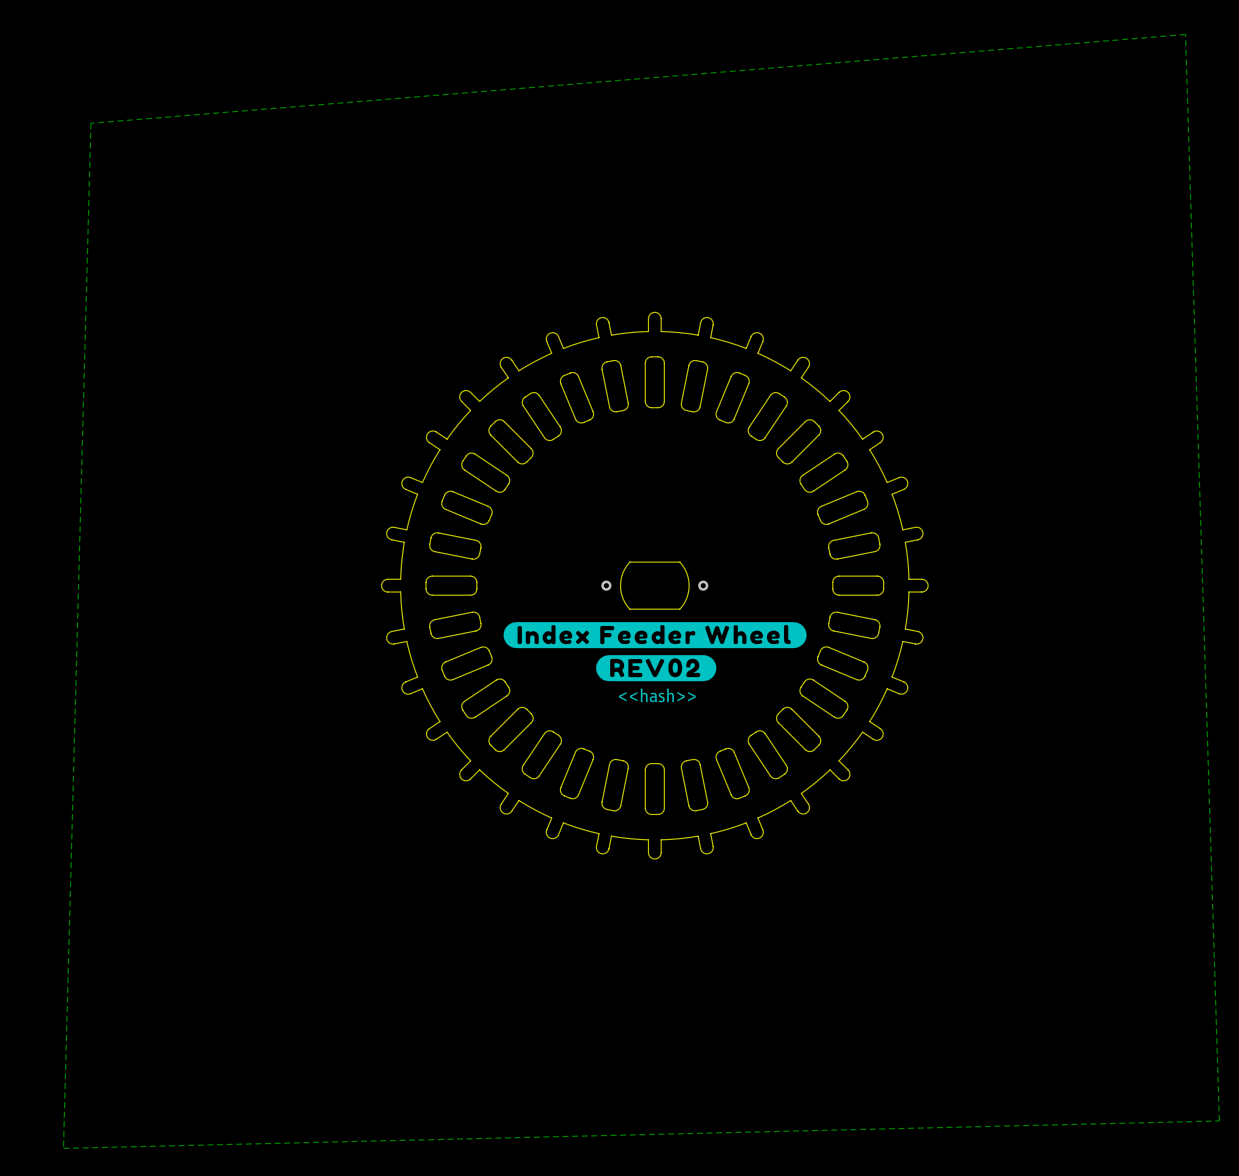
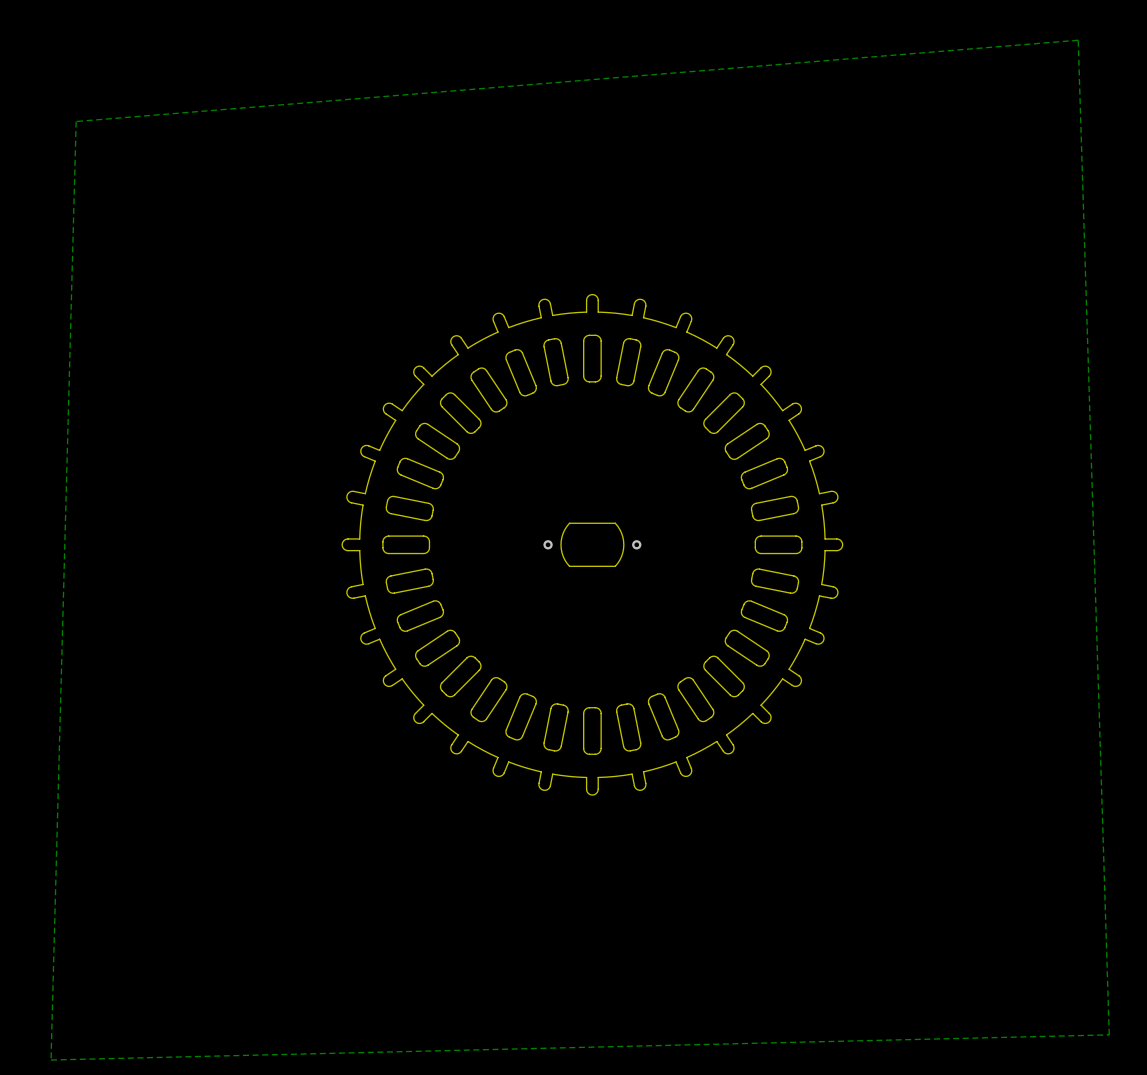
drawing: [503, 622, 807, 682] -> none
text: <<hash>> (657, 695) -> none

